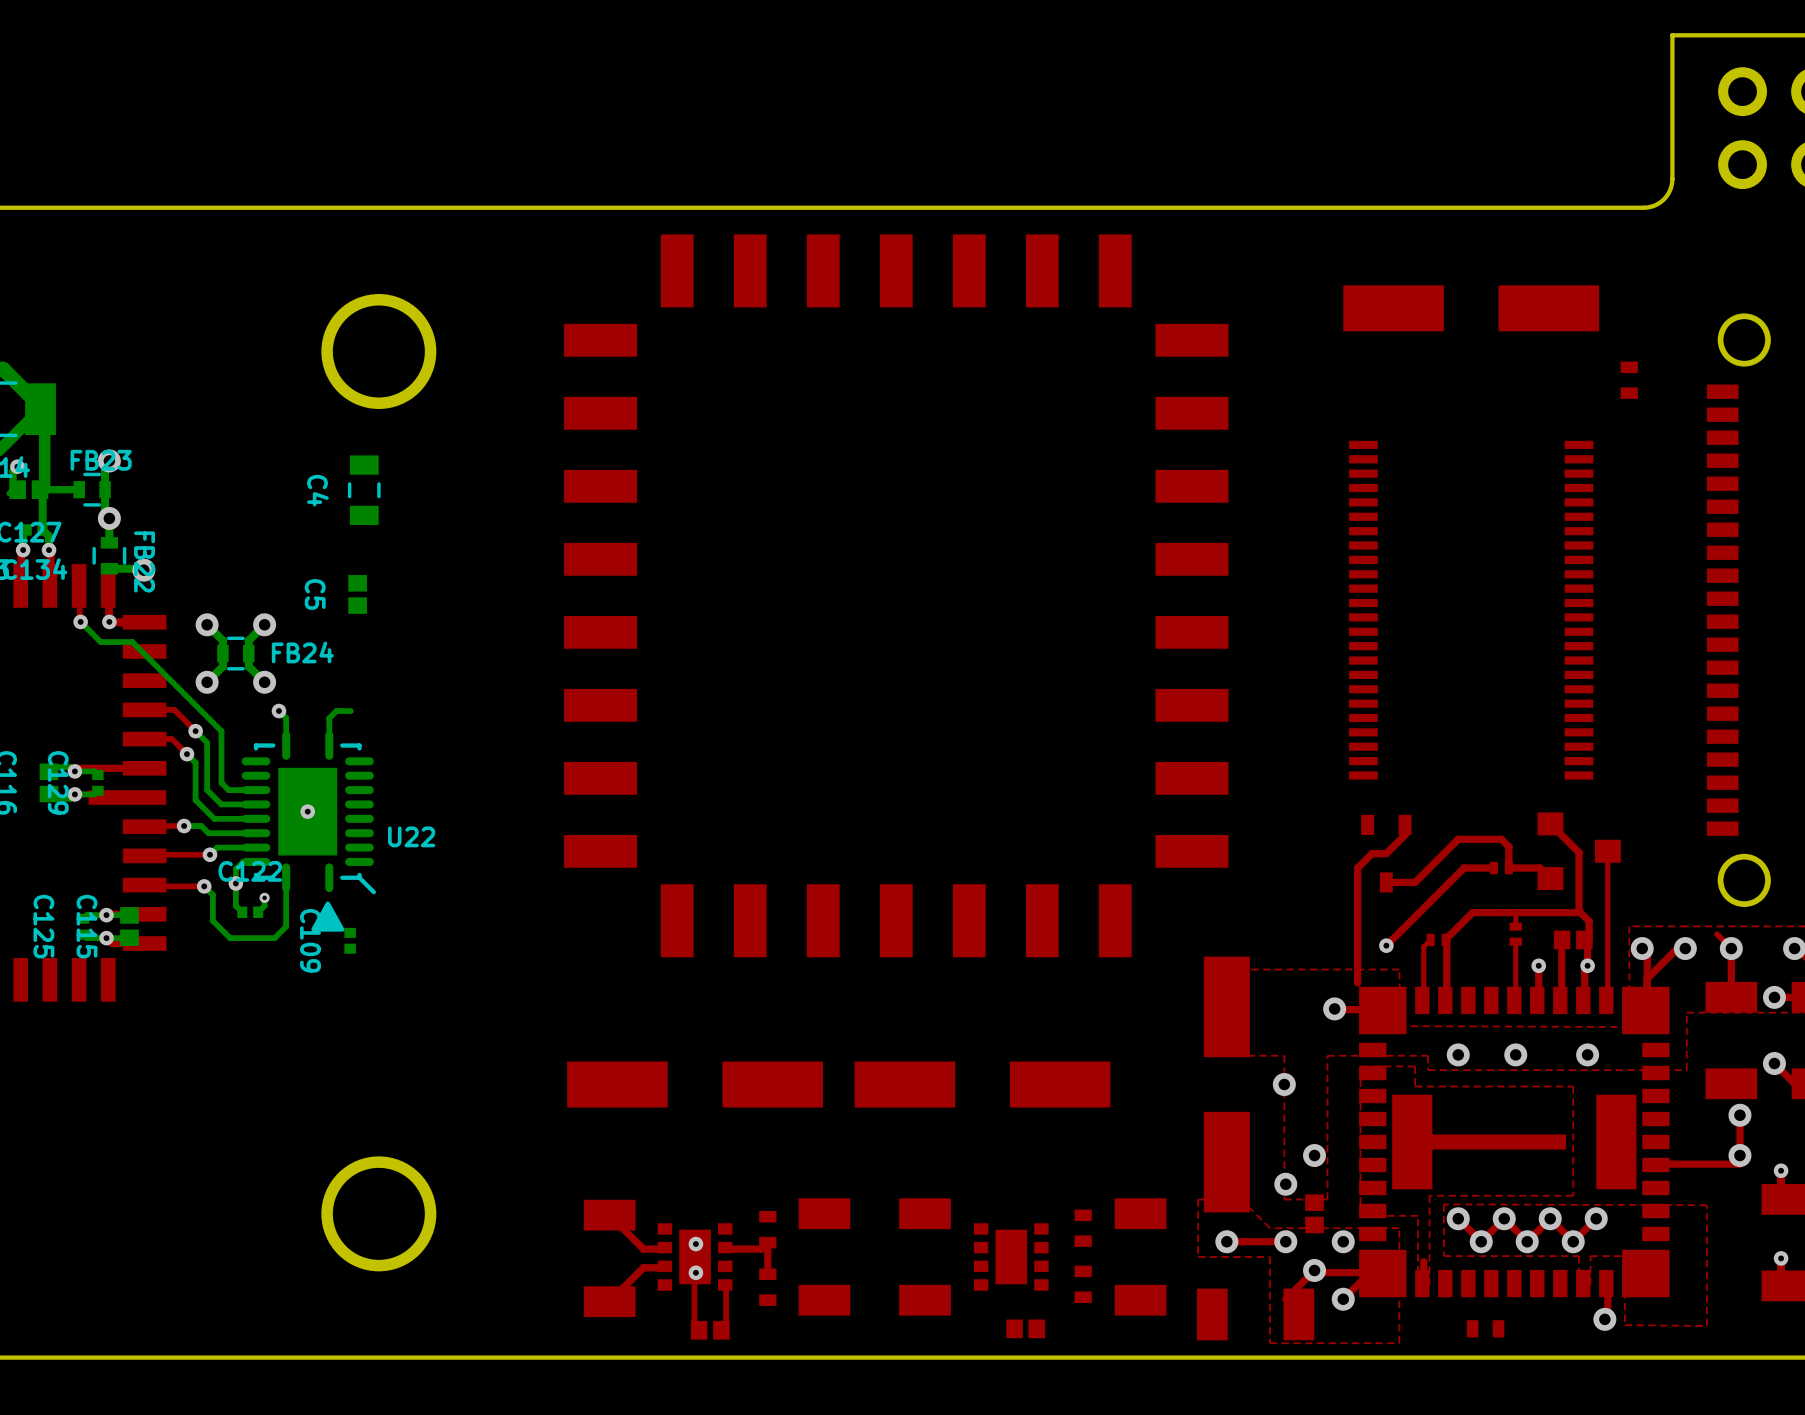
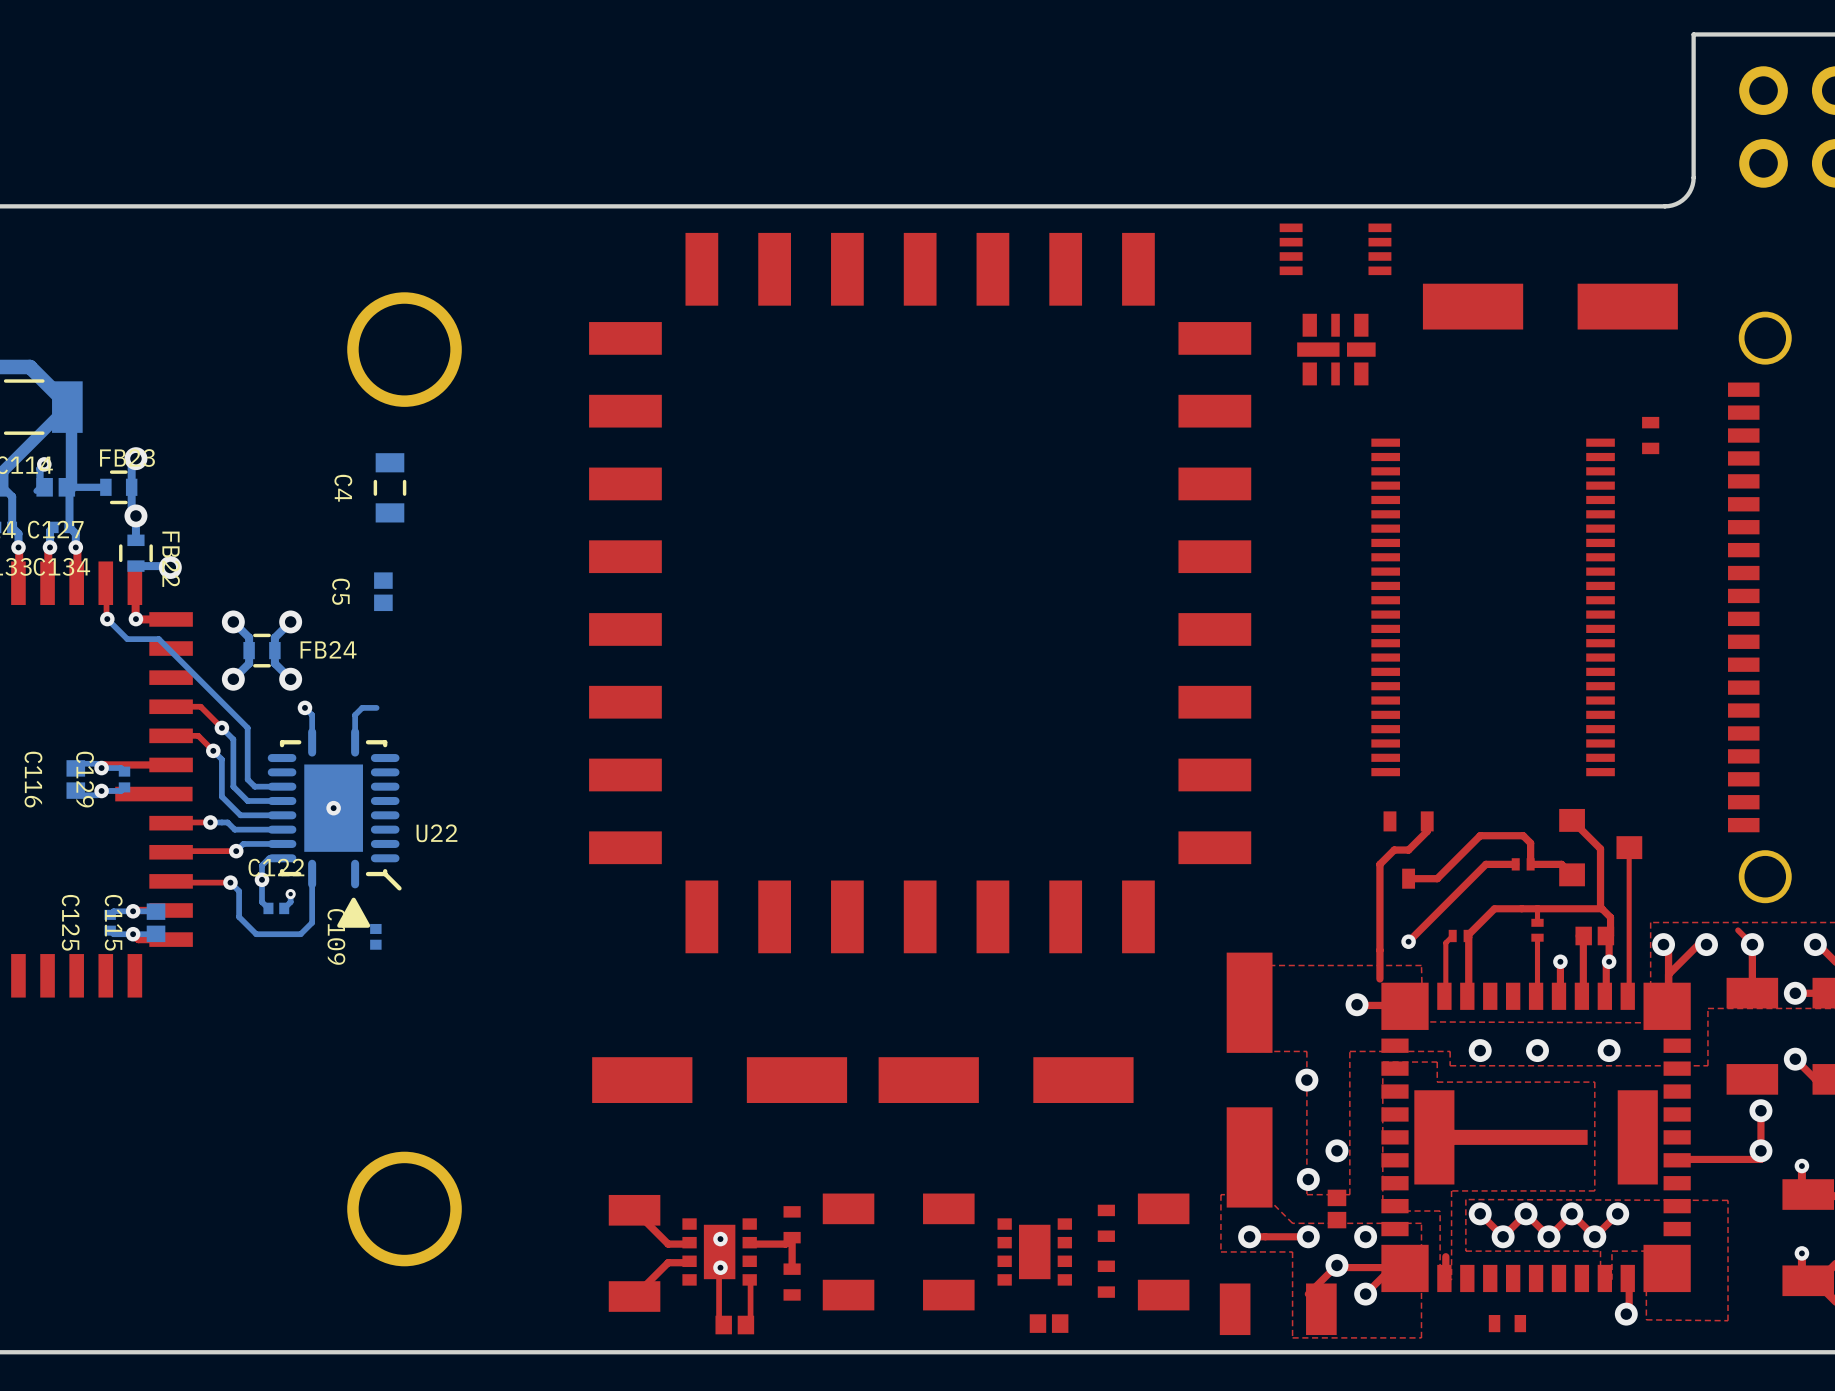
part: none -> (1335, 249)
part position: (1471, 308) -> (1550, 306)
part: none -> (1336, 349)
part position: (1629, 380) -> (1650, 435)

